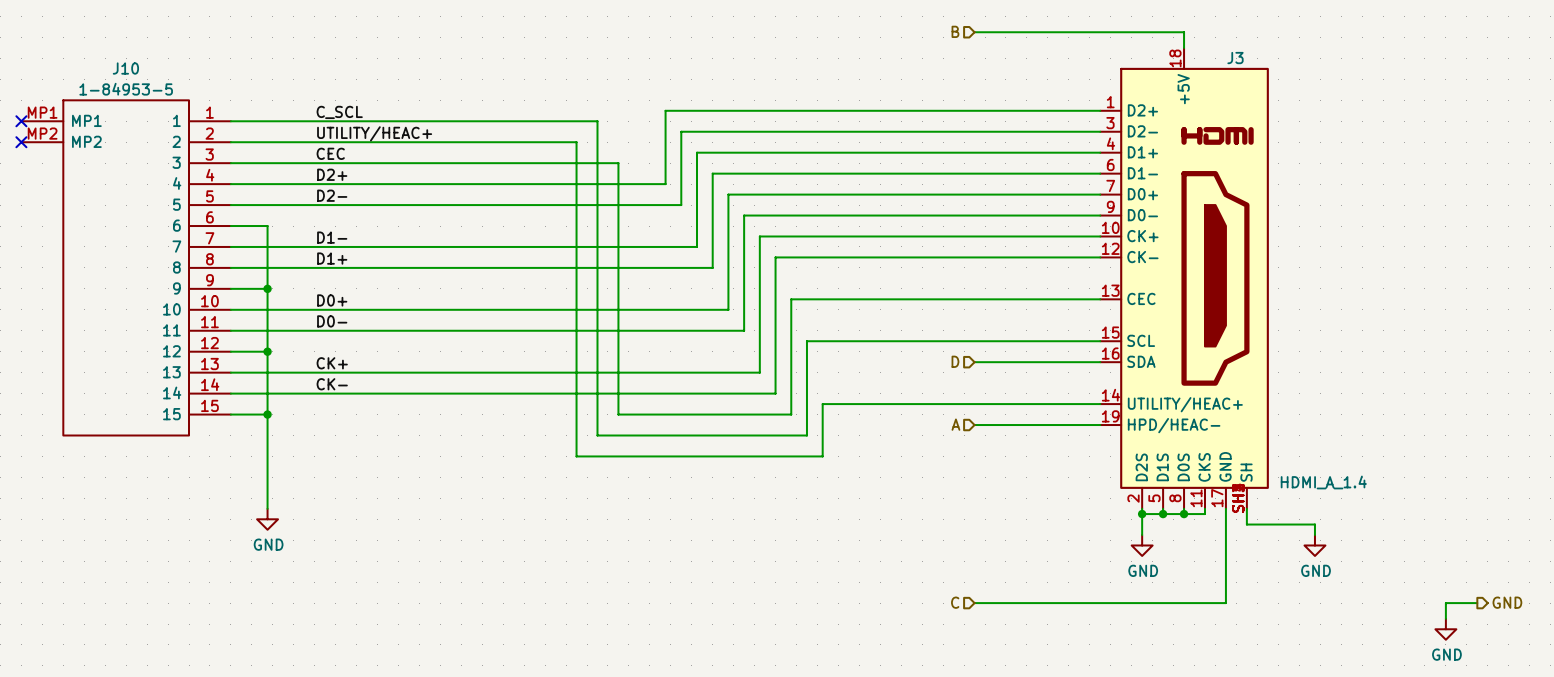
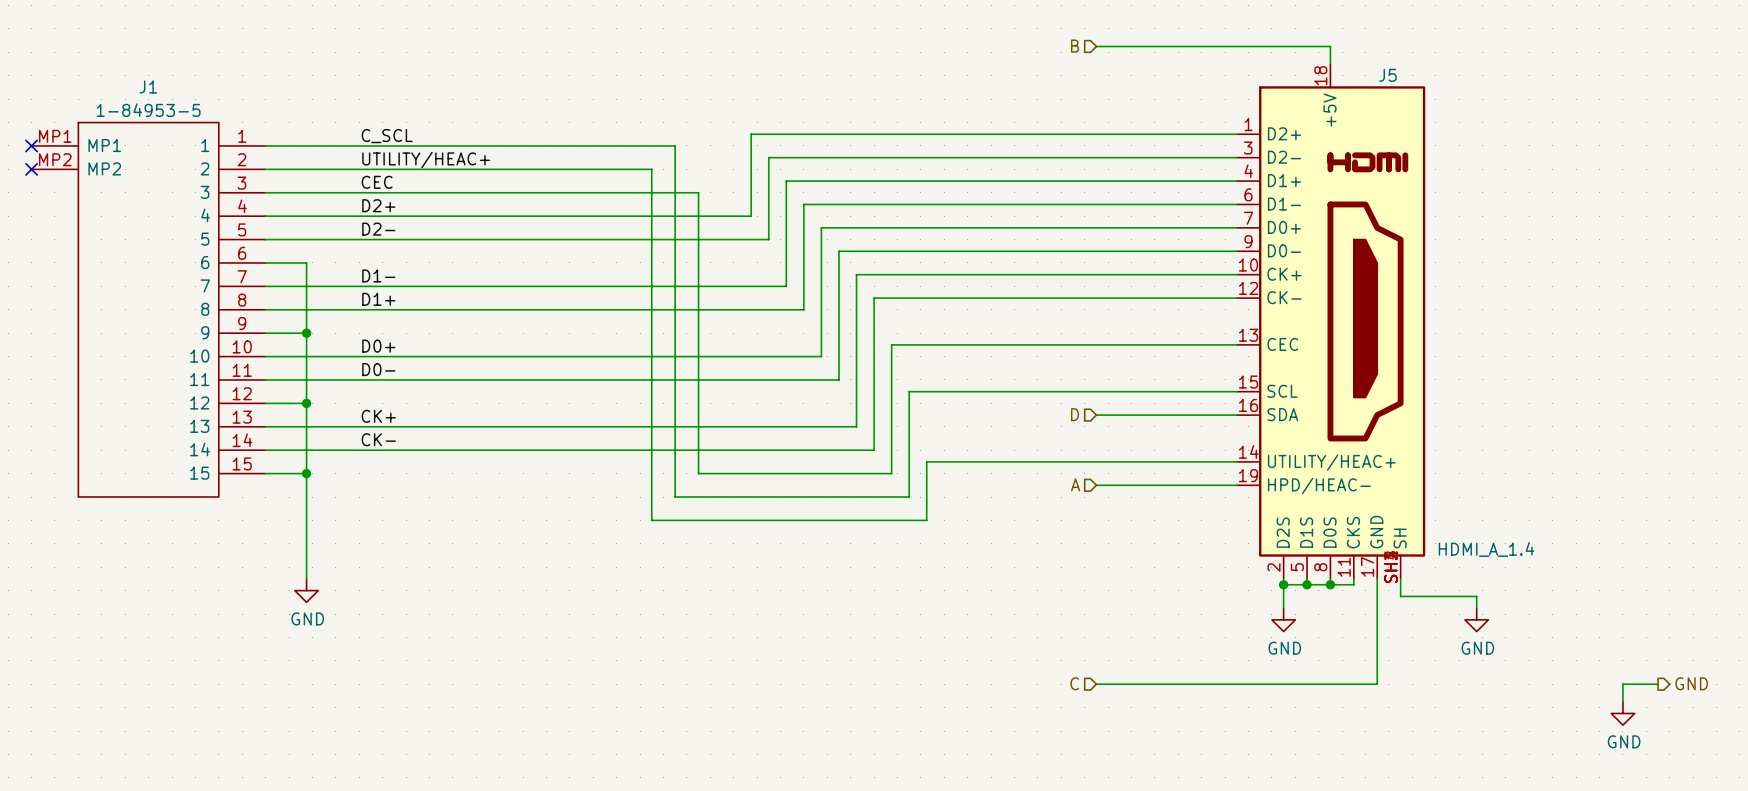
J3 name: J3 (1235, 58) -> J5 (1387, 75)
J10 name: J10 (125, 68) -> J1 (148, 87)

